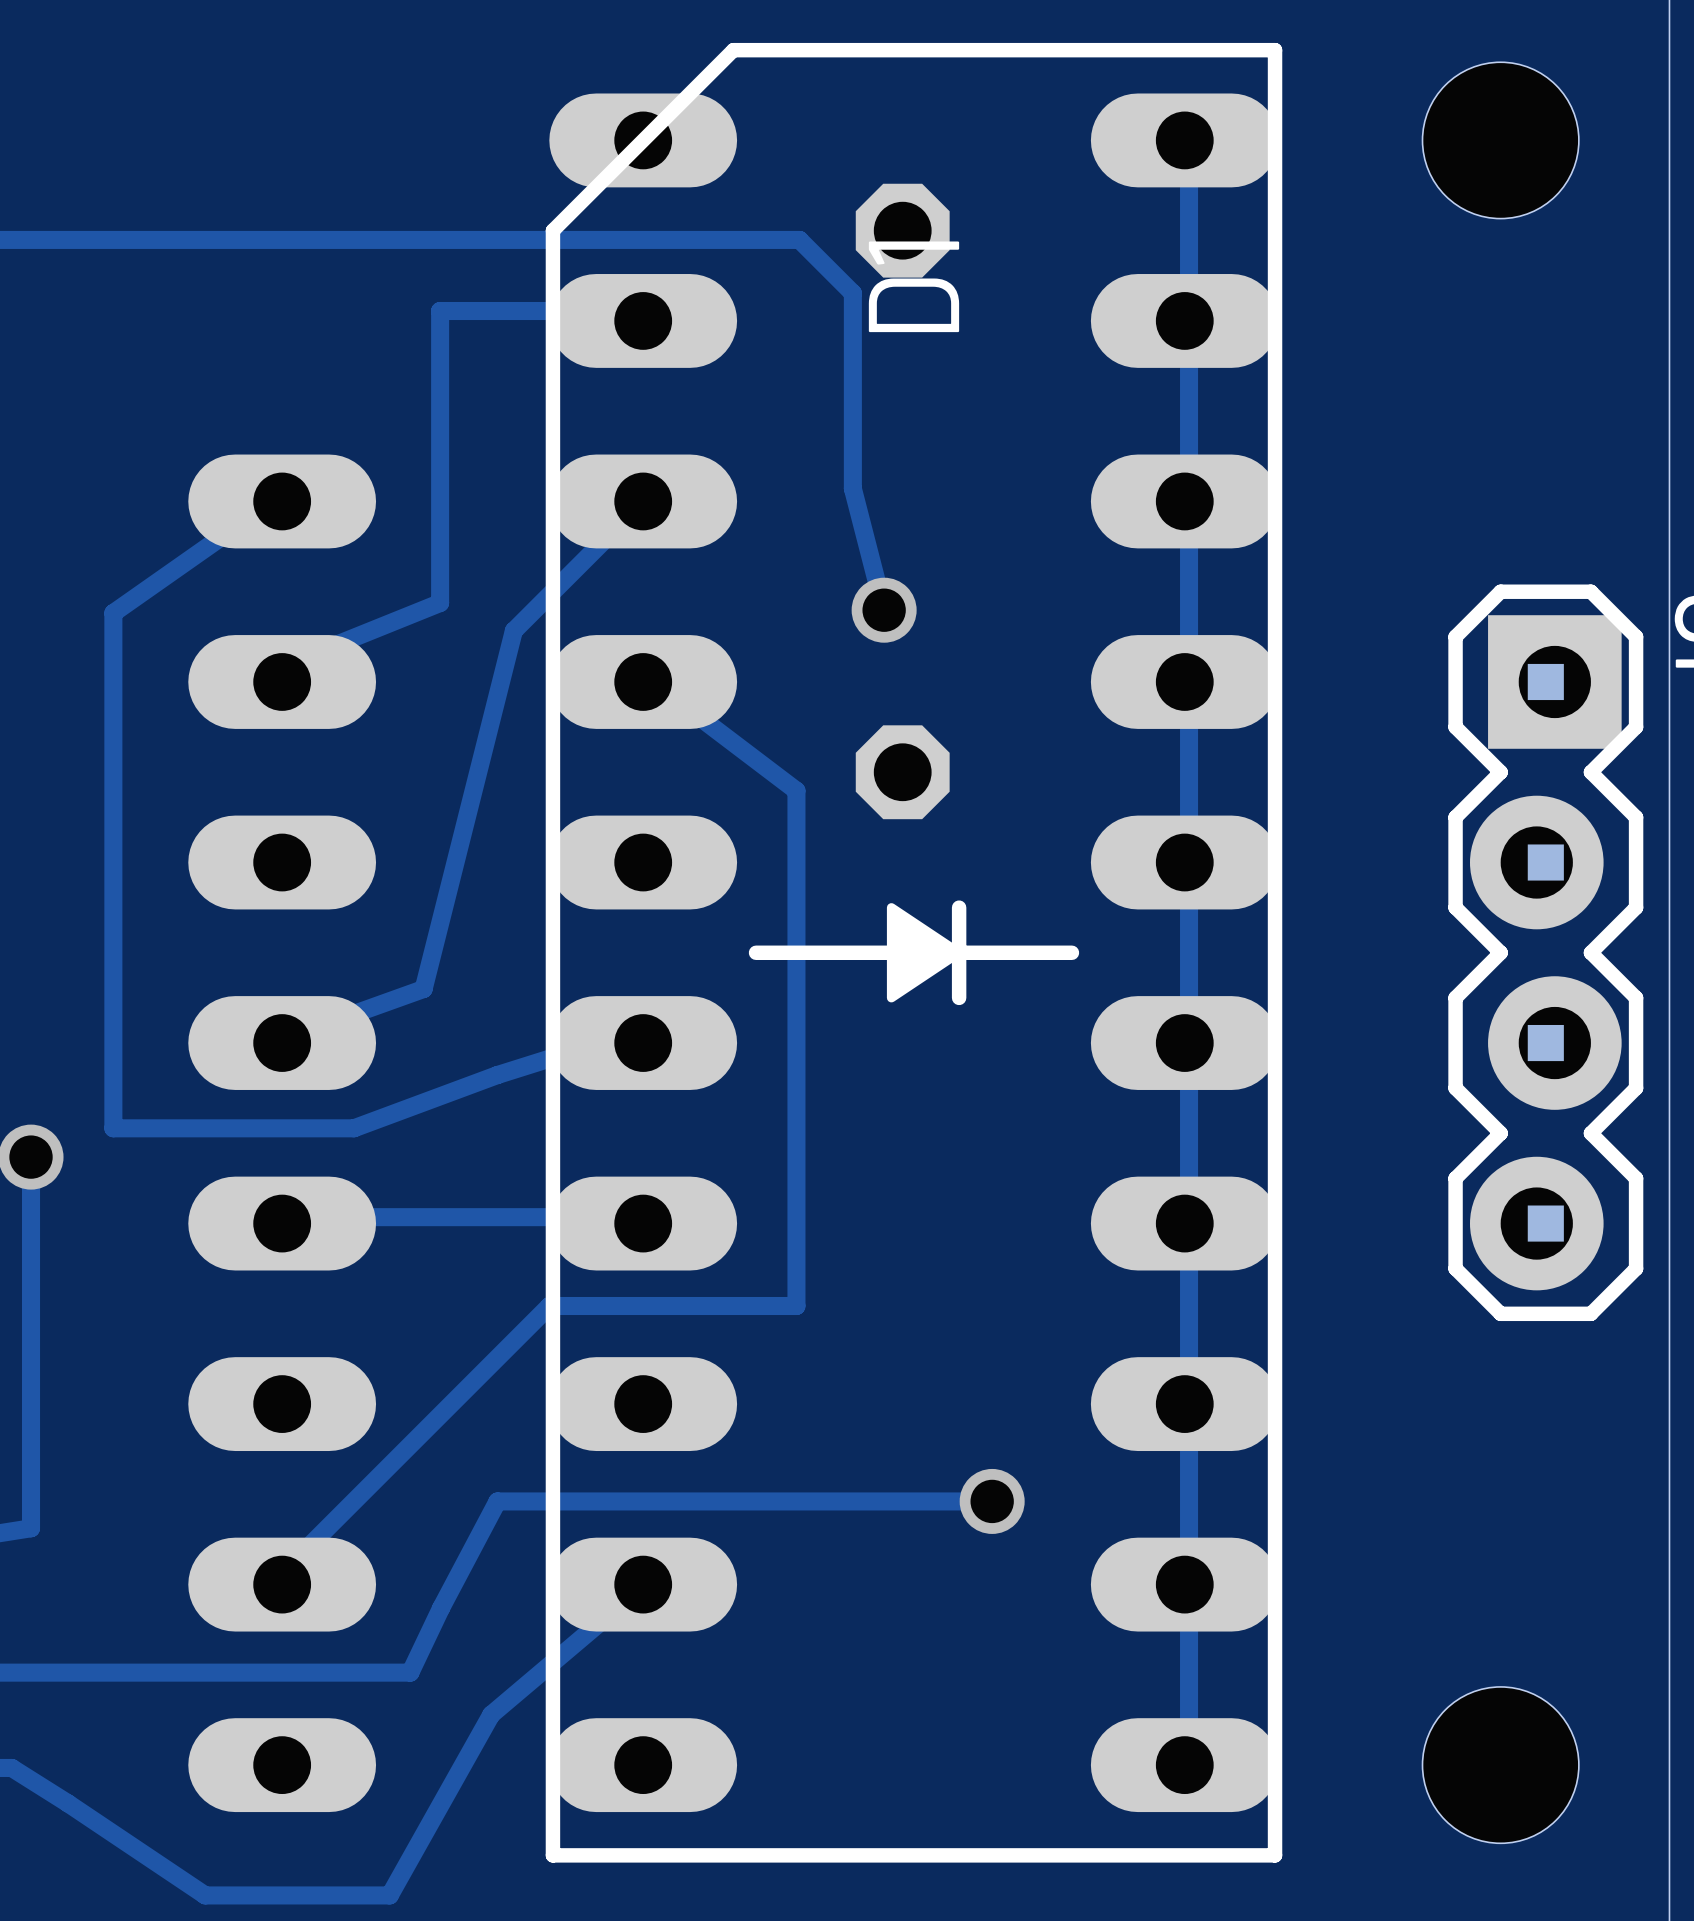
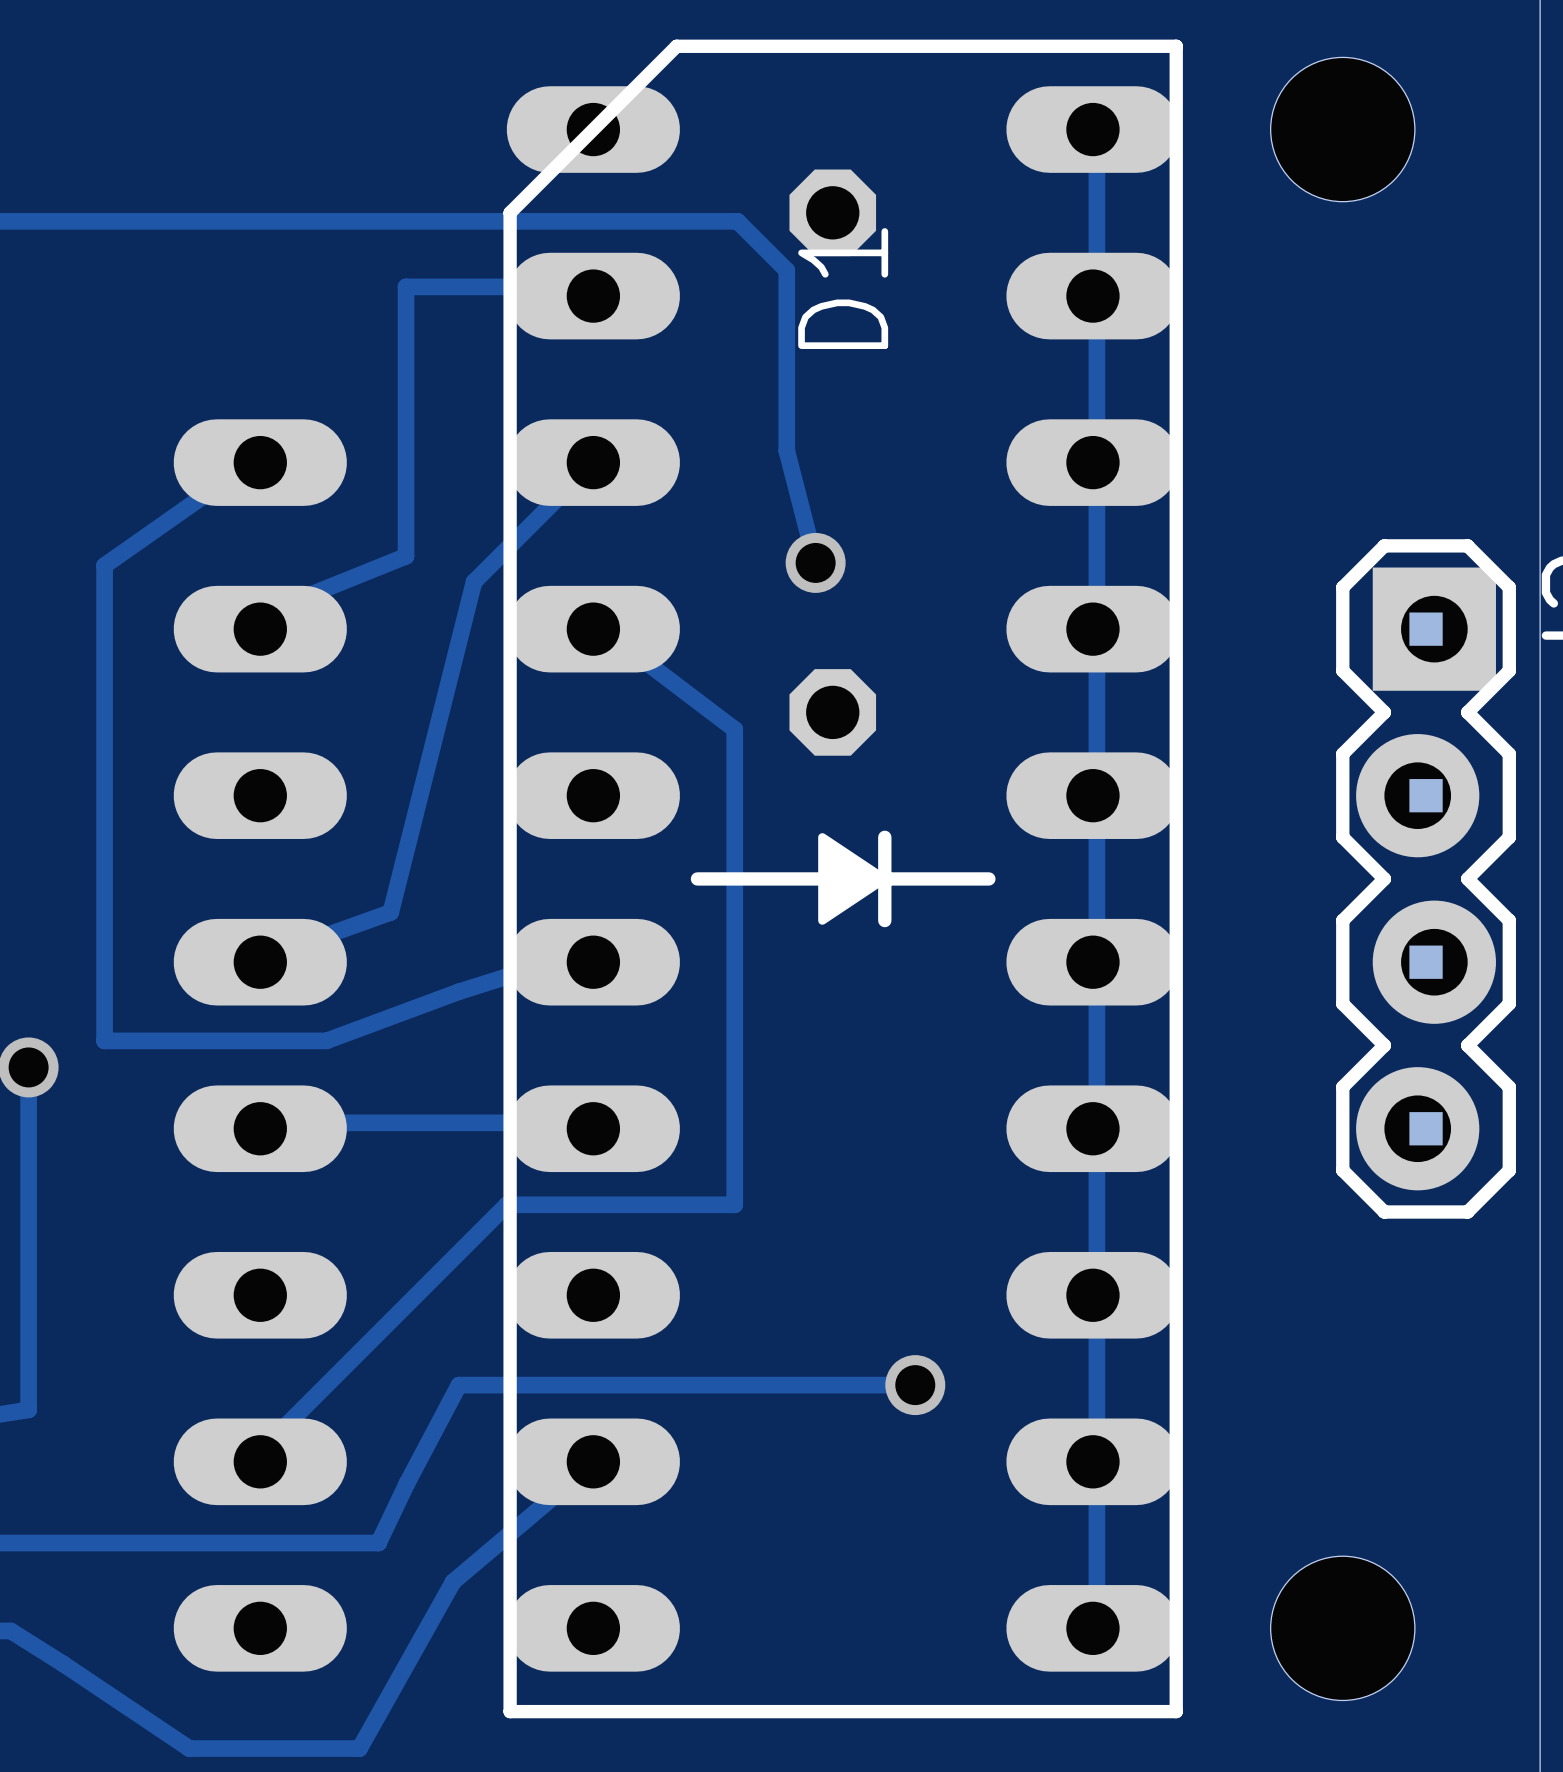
hole position: (1500, 140) -> (1342, 129)
hole position: (1500, 1765) -> (1342, 1628)

